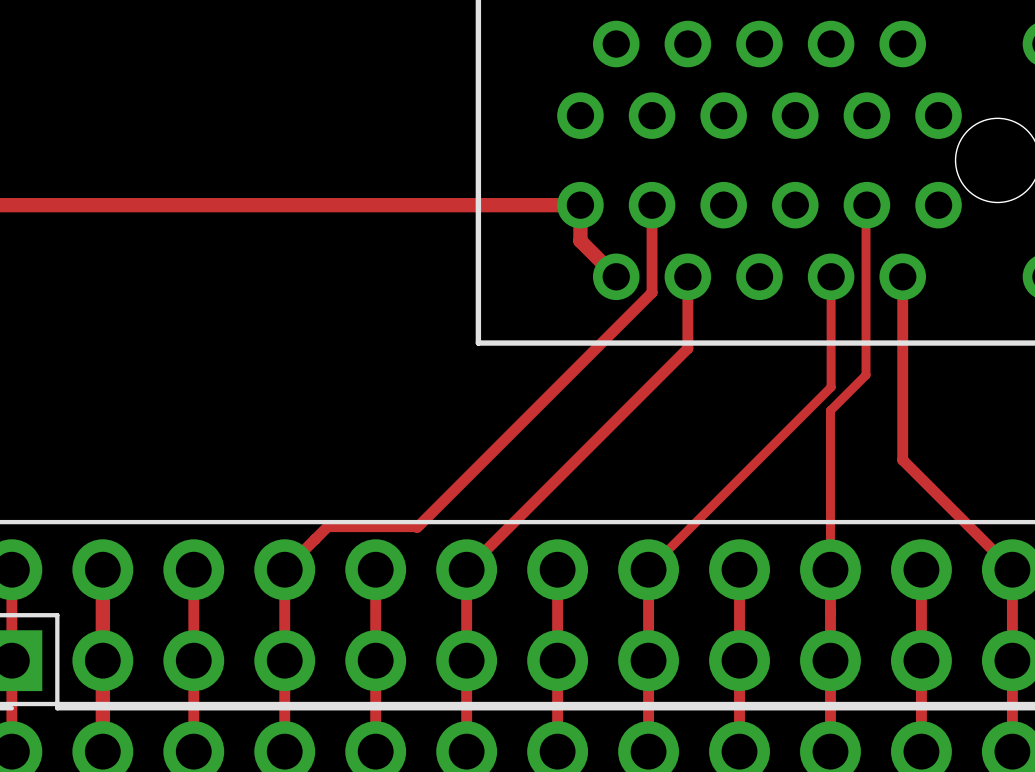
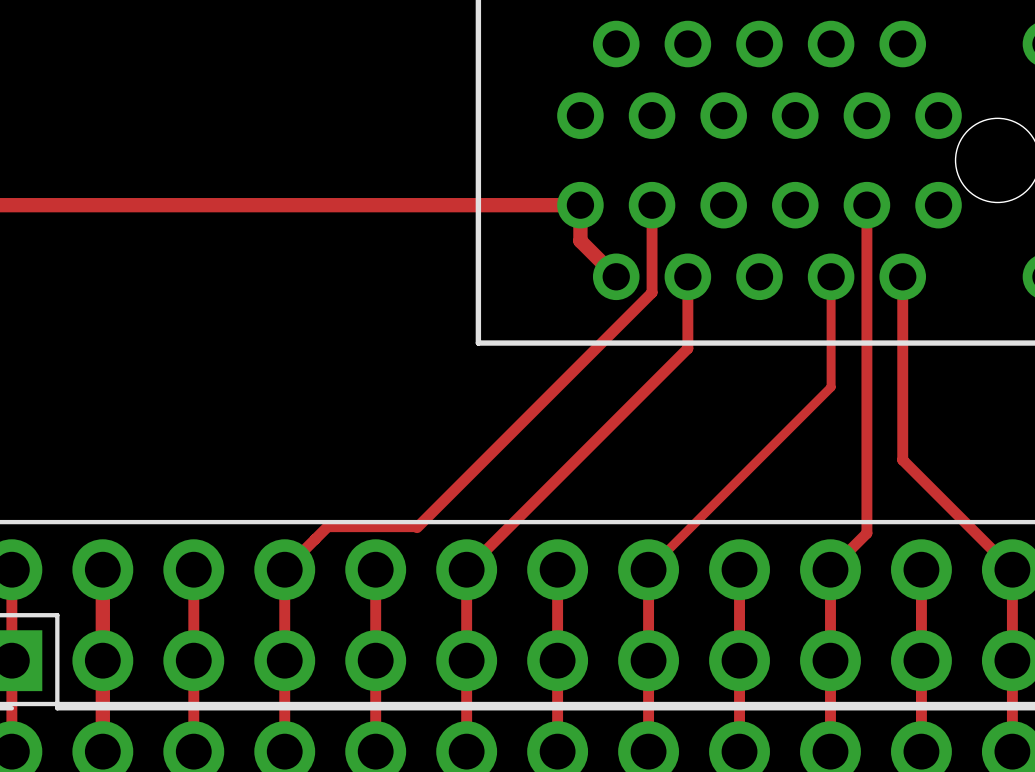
track: (866, 206) (866, 375) (830, 410) (830, 569) -> (866, 205) (866, 533) (830, 569)

